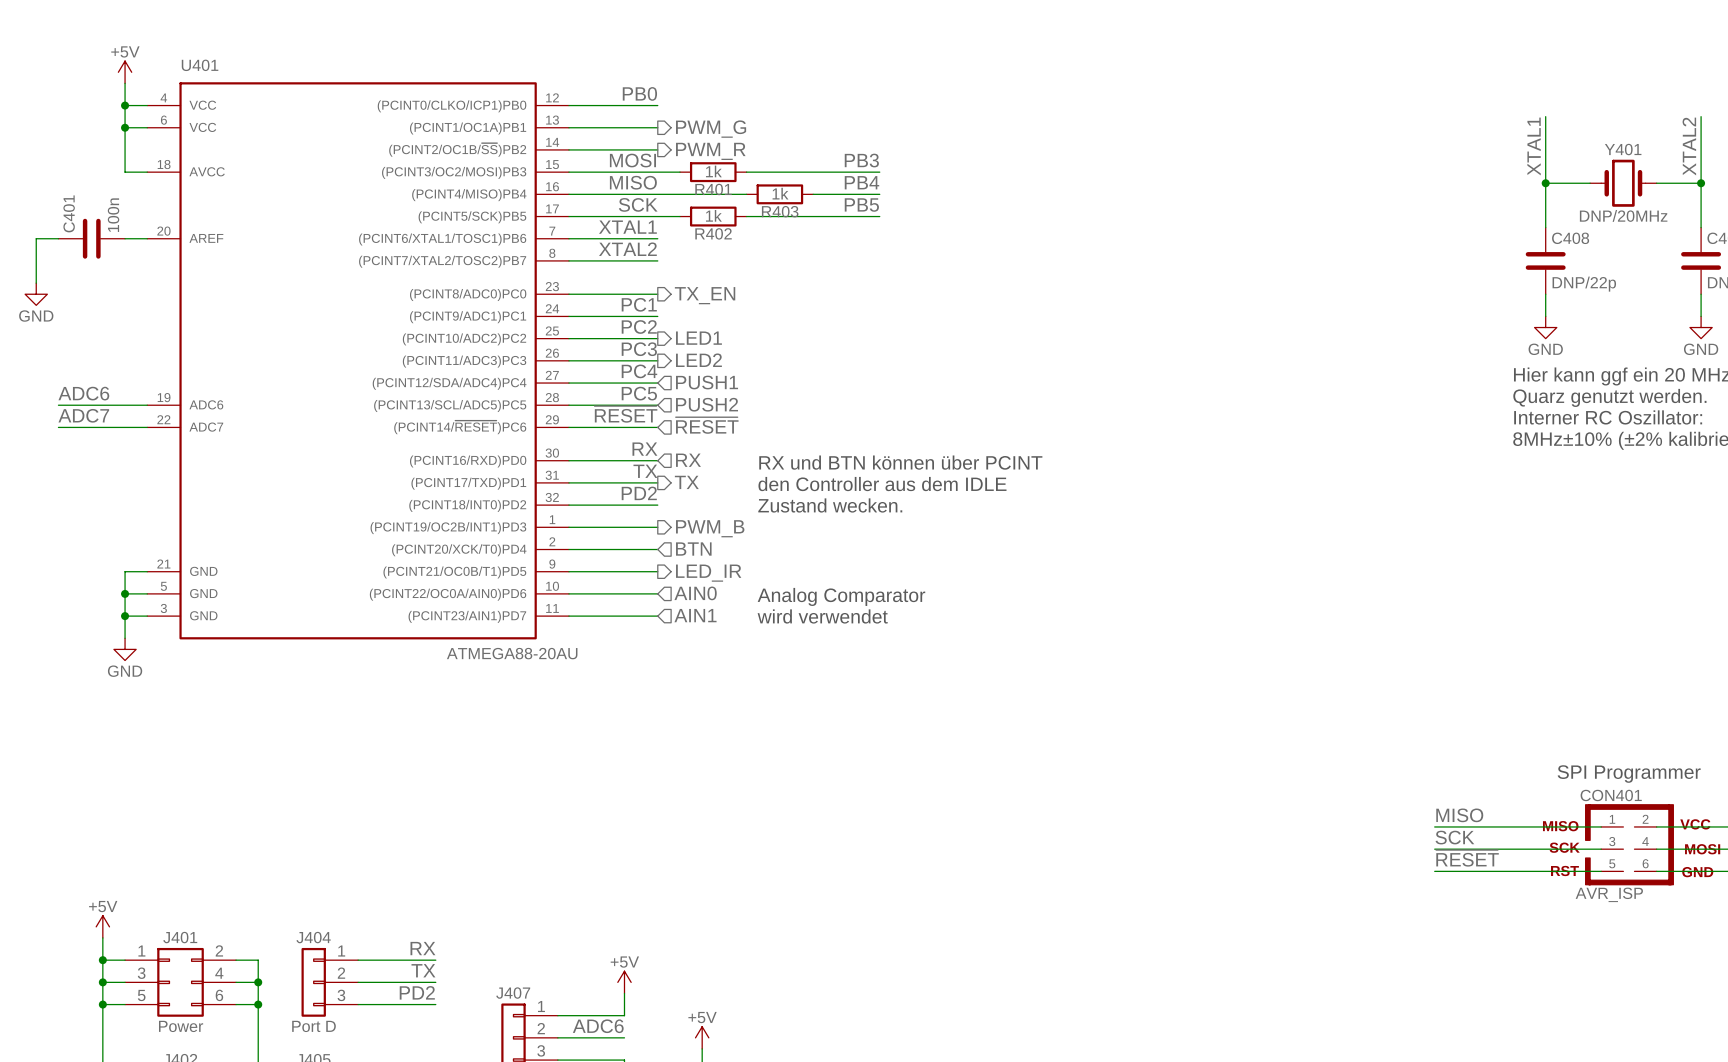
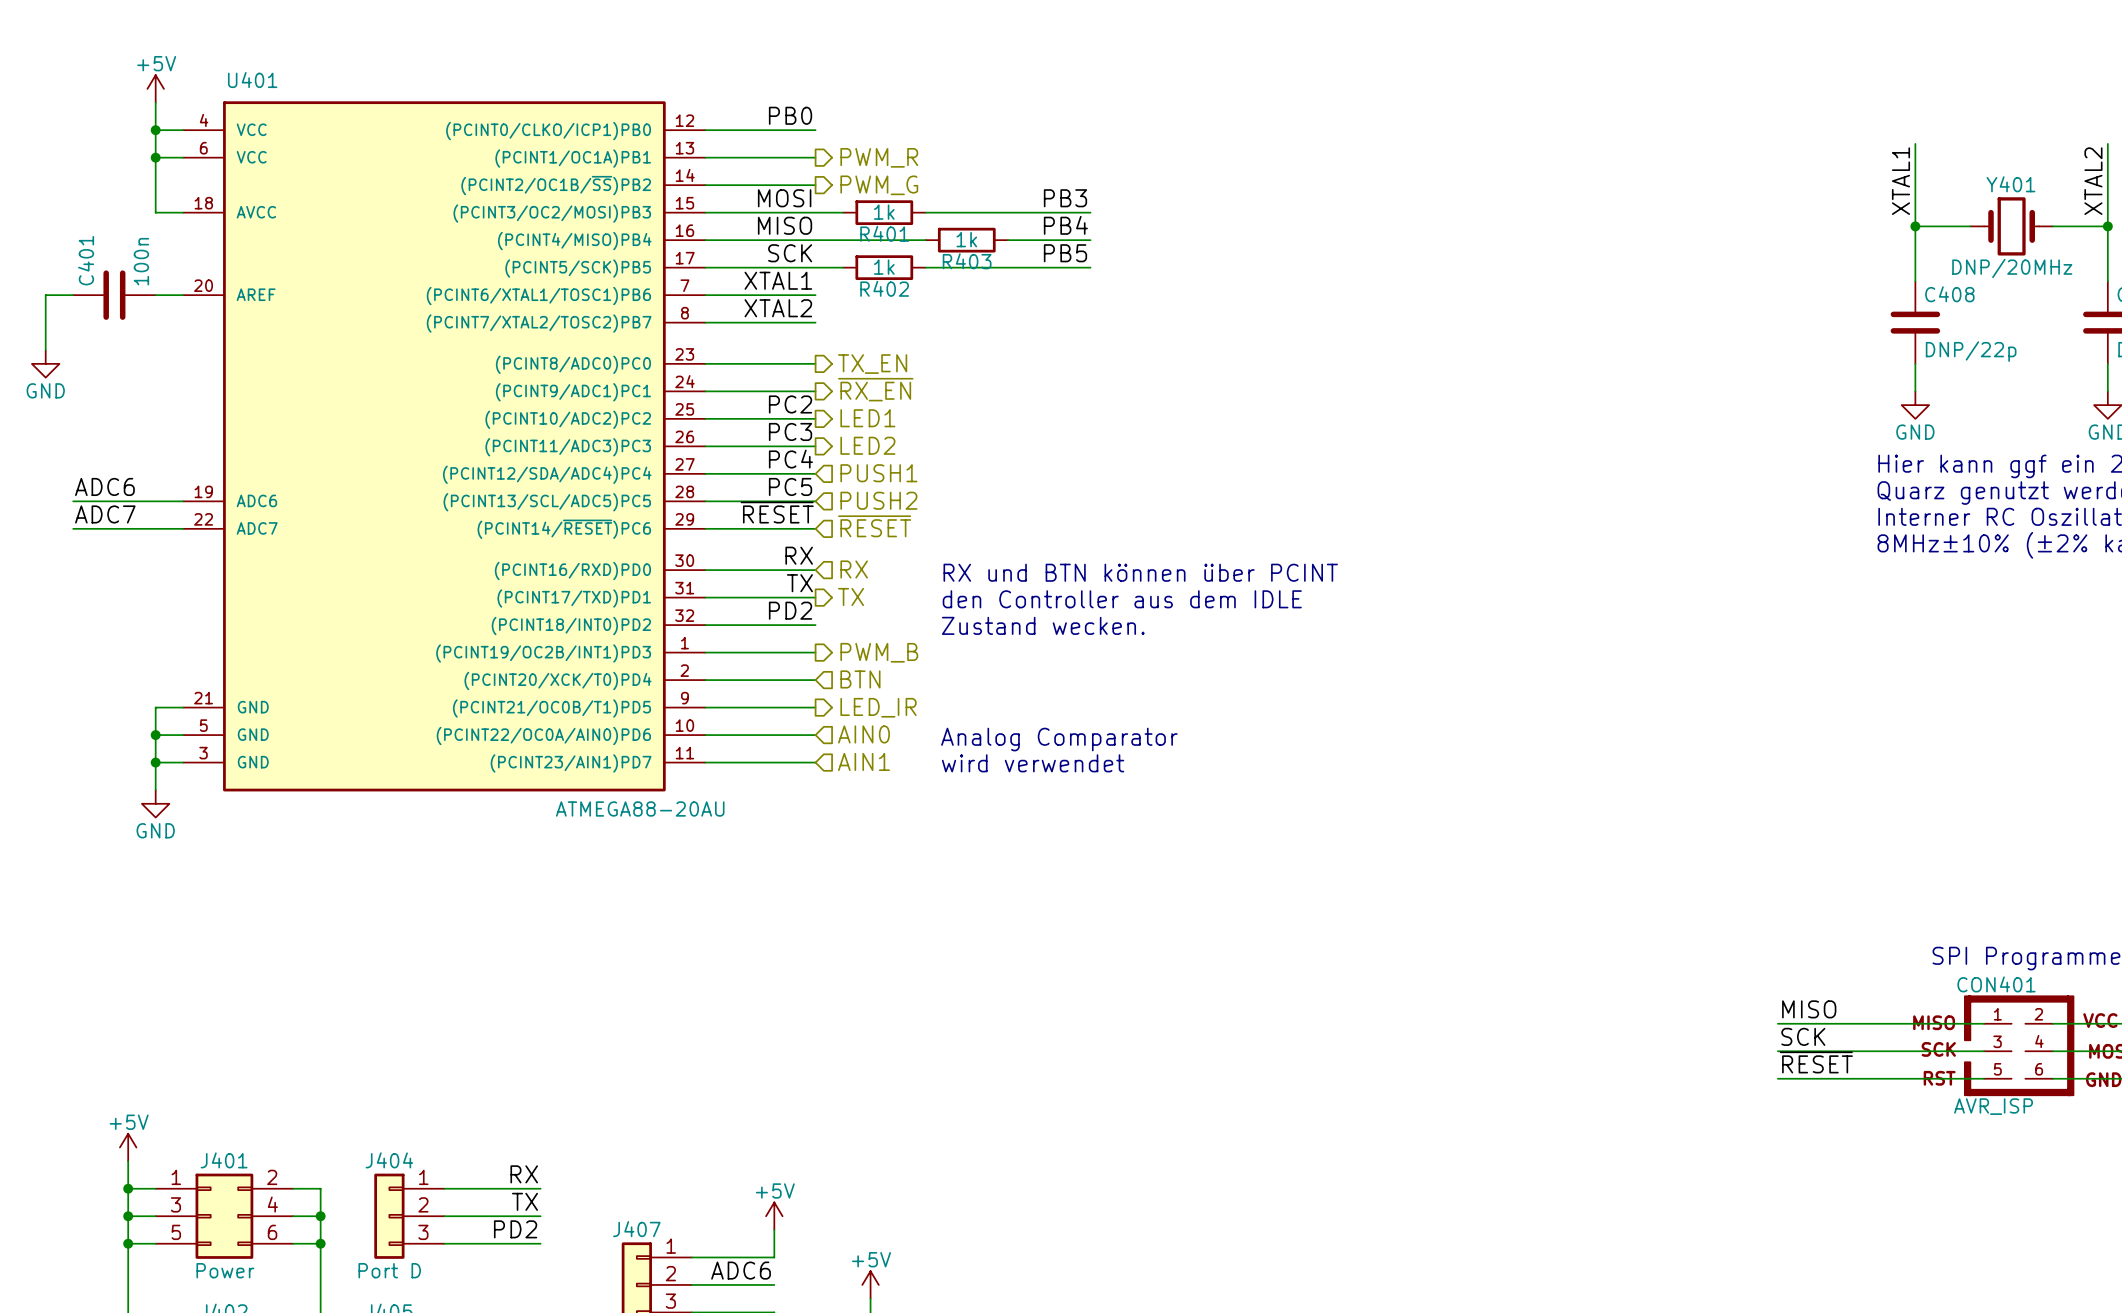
hierarchical label: PWM_G (711, 129) -> PWM_R (879, 157)
hierarchical label: PWM_R (710, 151) -> PWM_G (879, 185)
label: PC1 (639, 304) -> none
hierarchical label: none -> ~{RX_EN} (875, 389)

